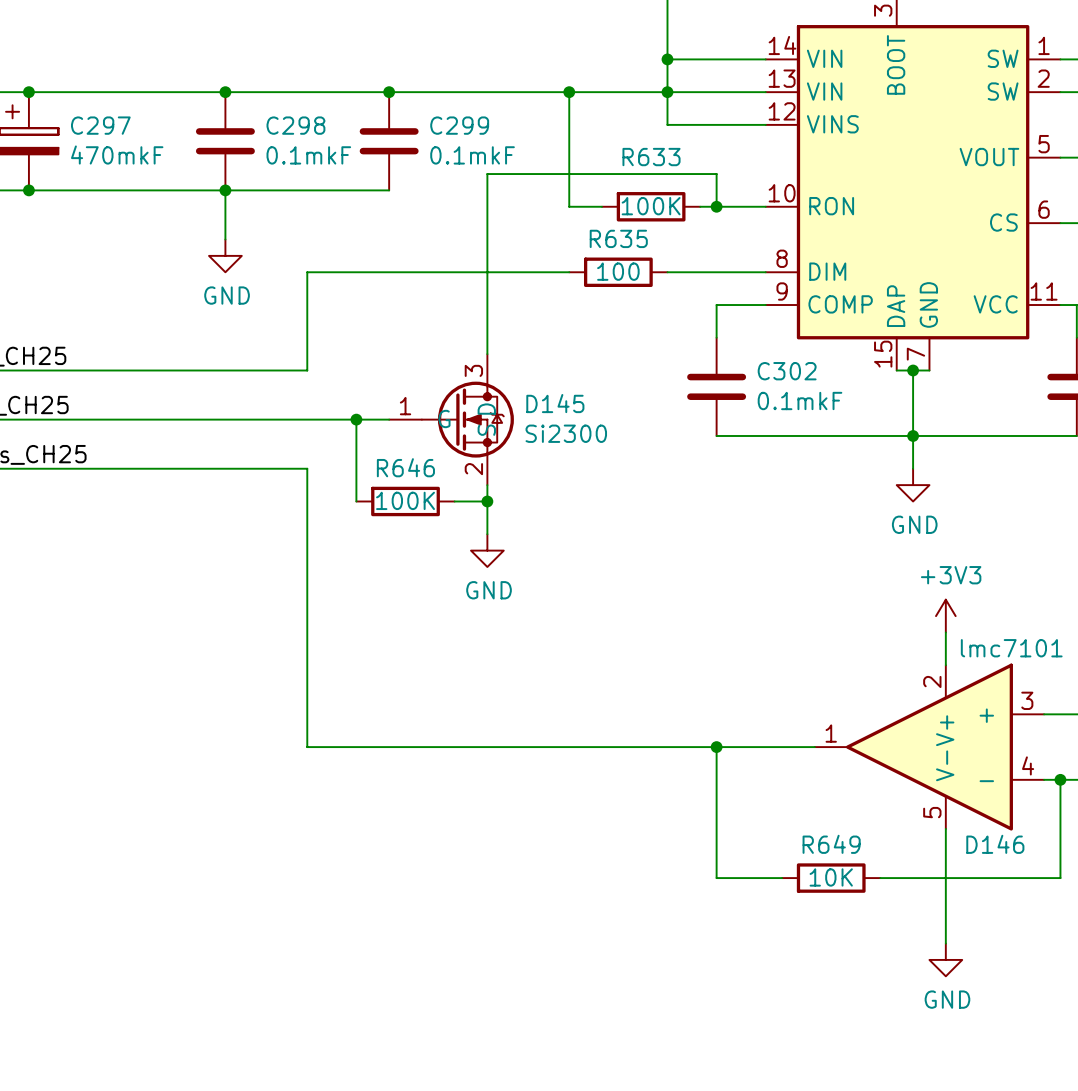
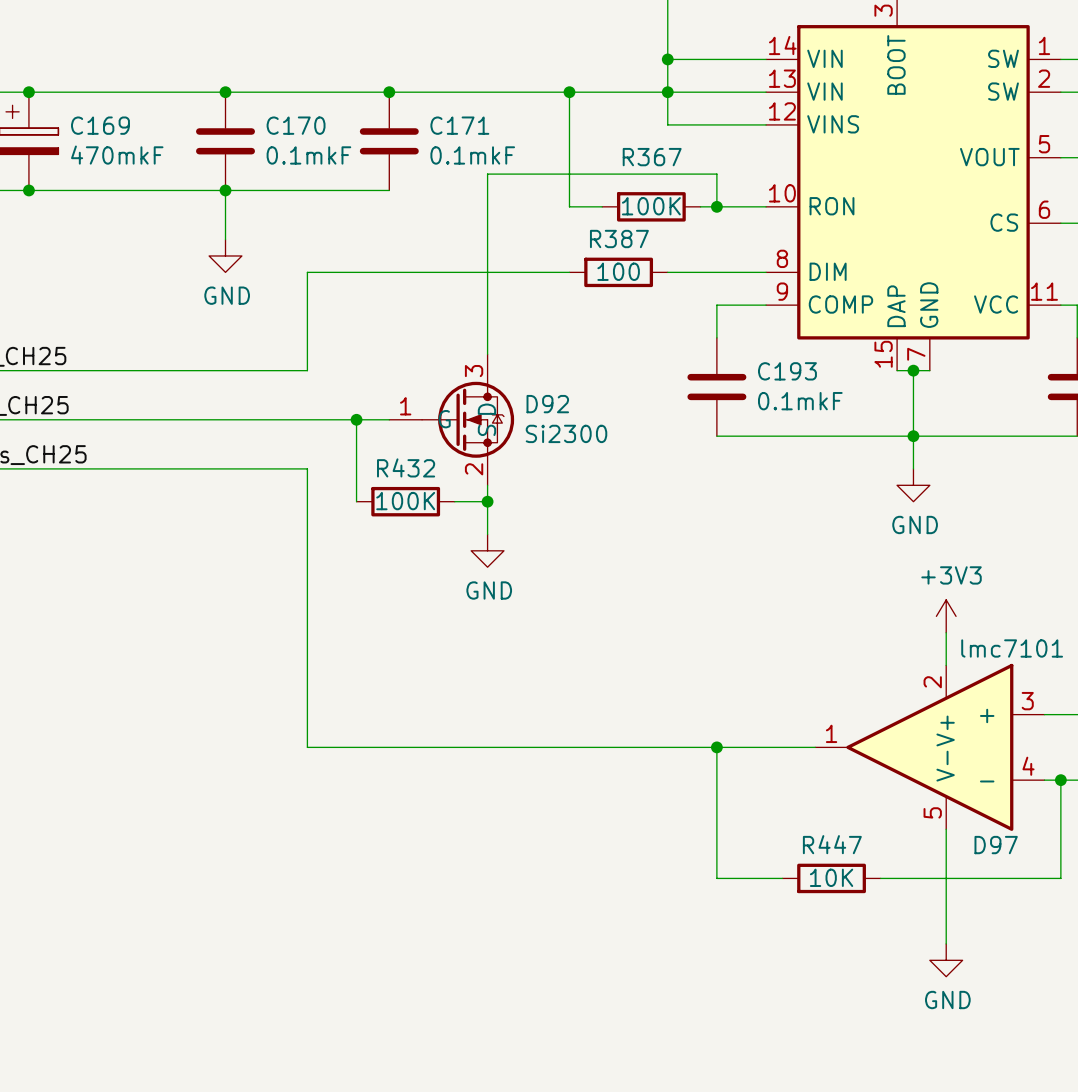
C297 name: C297 (100, 125) -> C169 (100, 125)
C298 name: C298 (295, 125) -> C170 (296, 125)
C299 name: C299 (459, 125) -> C171 (459, 125)
R633 name: R633 (651, 157) -> R367 (652, 157)
R635 name: R635 (618, 238) -> R387 (619, 239)
C302 name: C302 (787, 371) -> C193 (787, 371)
D145 name: D145 (555, 403) -> D92 (547, 404)
R646 name: R646 (405, 467) -> R432 (406, 467)
R649 name: R649 (831, 844) -> R447 (832, 844)
D146 name: D146 (995, 844) -> D97 (996, 845)

